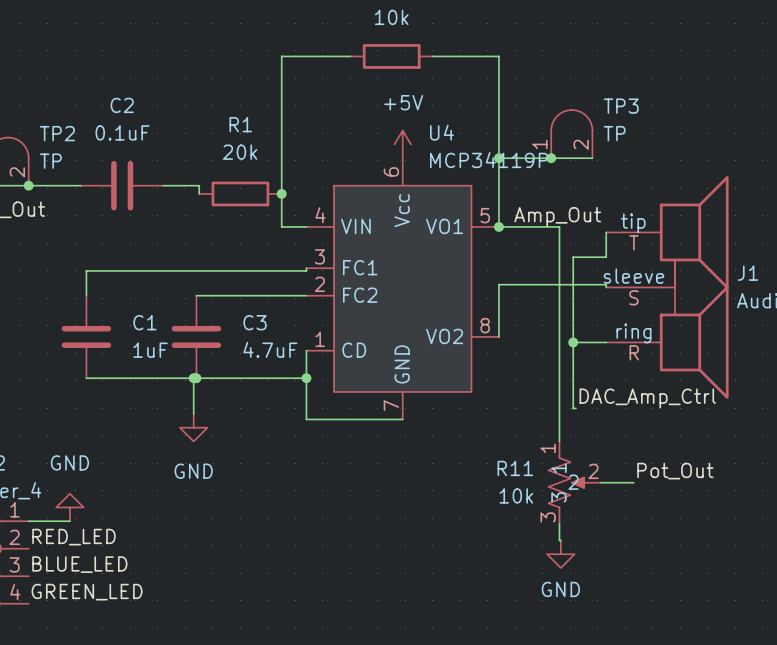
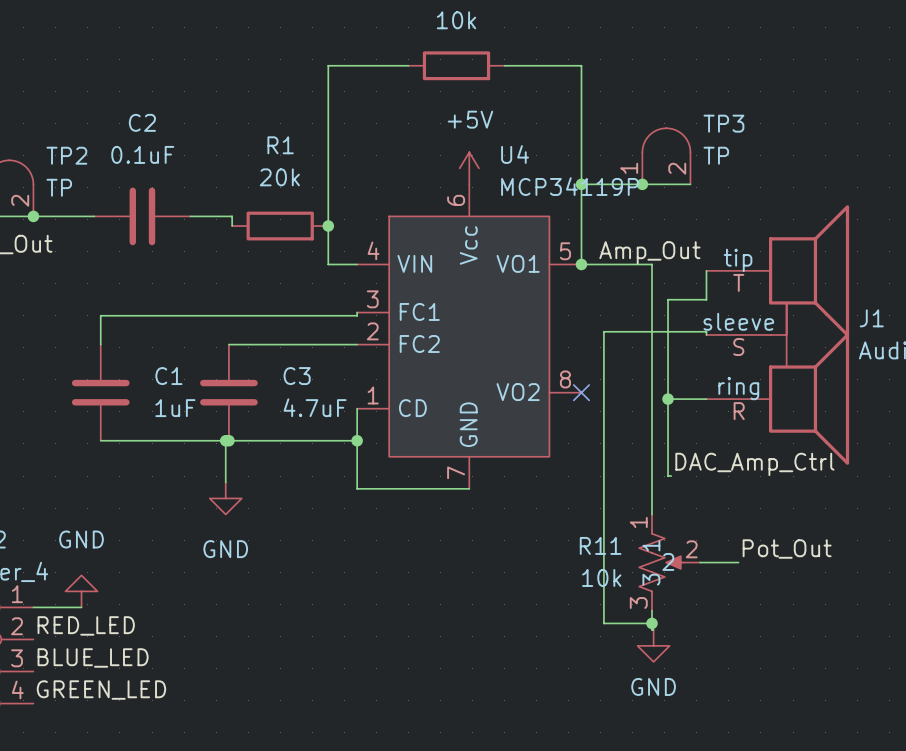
wire: (518, 284) (498, 284) (498, 336) -> (603, 331) (603, 623) (652, 623)
no-connect mark: none -> (581, 392)
junction: none -> (652, 623)

